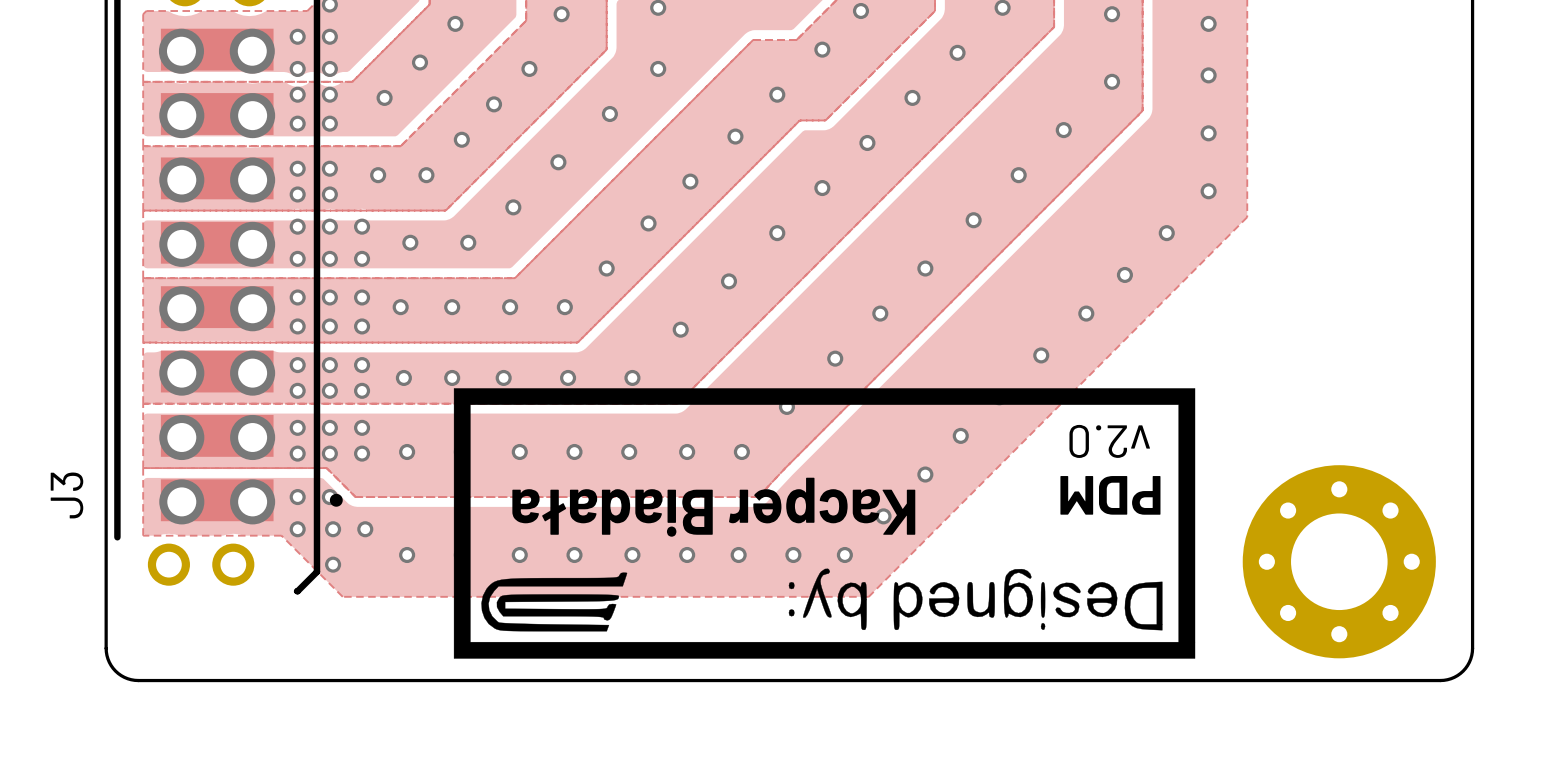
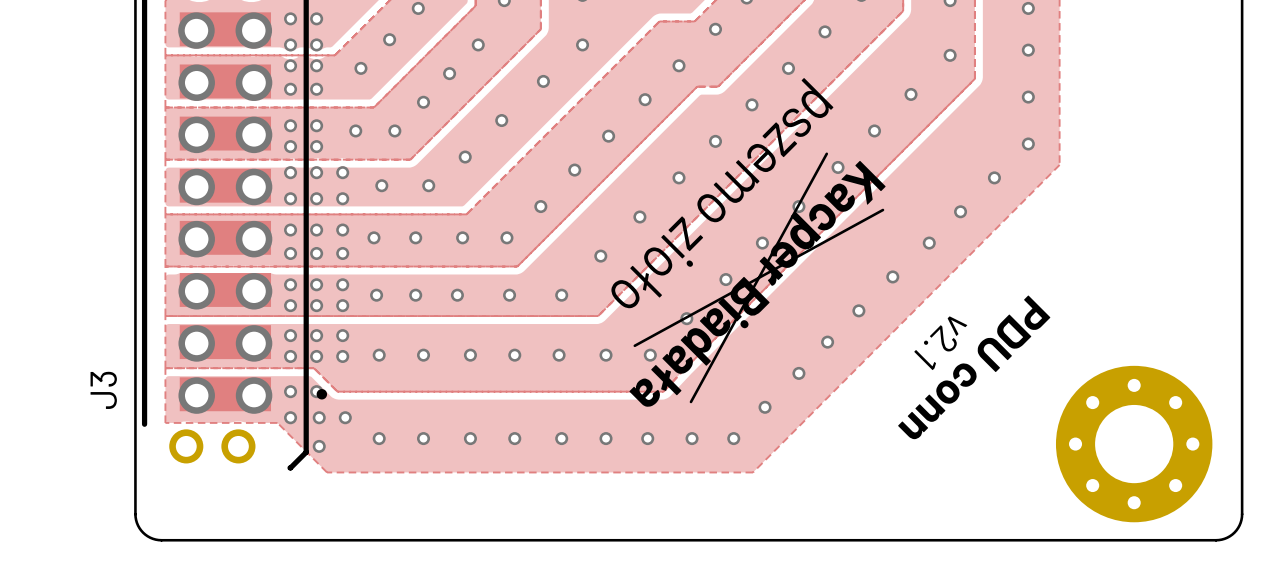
line: none -> (826, 153) (690, 401)
text: none -> pszemo zioło (722, 193)
line: none -> (882, 209) (634, 345)
drawing: [453, 388, 1196, 659] -> none
text: v2.0 (1109, 441) -> v2.1 (940, 343)
text: none -> PDU conn (974, 367)
text: PDM (1110, 495) -> none
text rotation: 0° (713, 507) -> 45° counterclockwise (757, 283)

